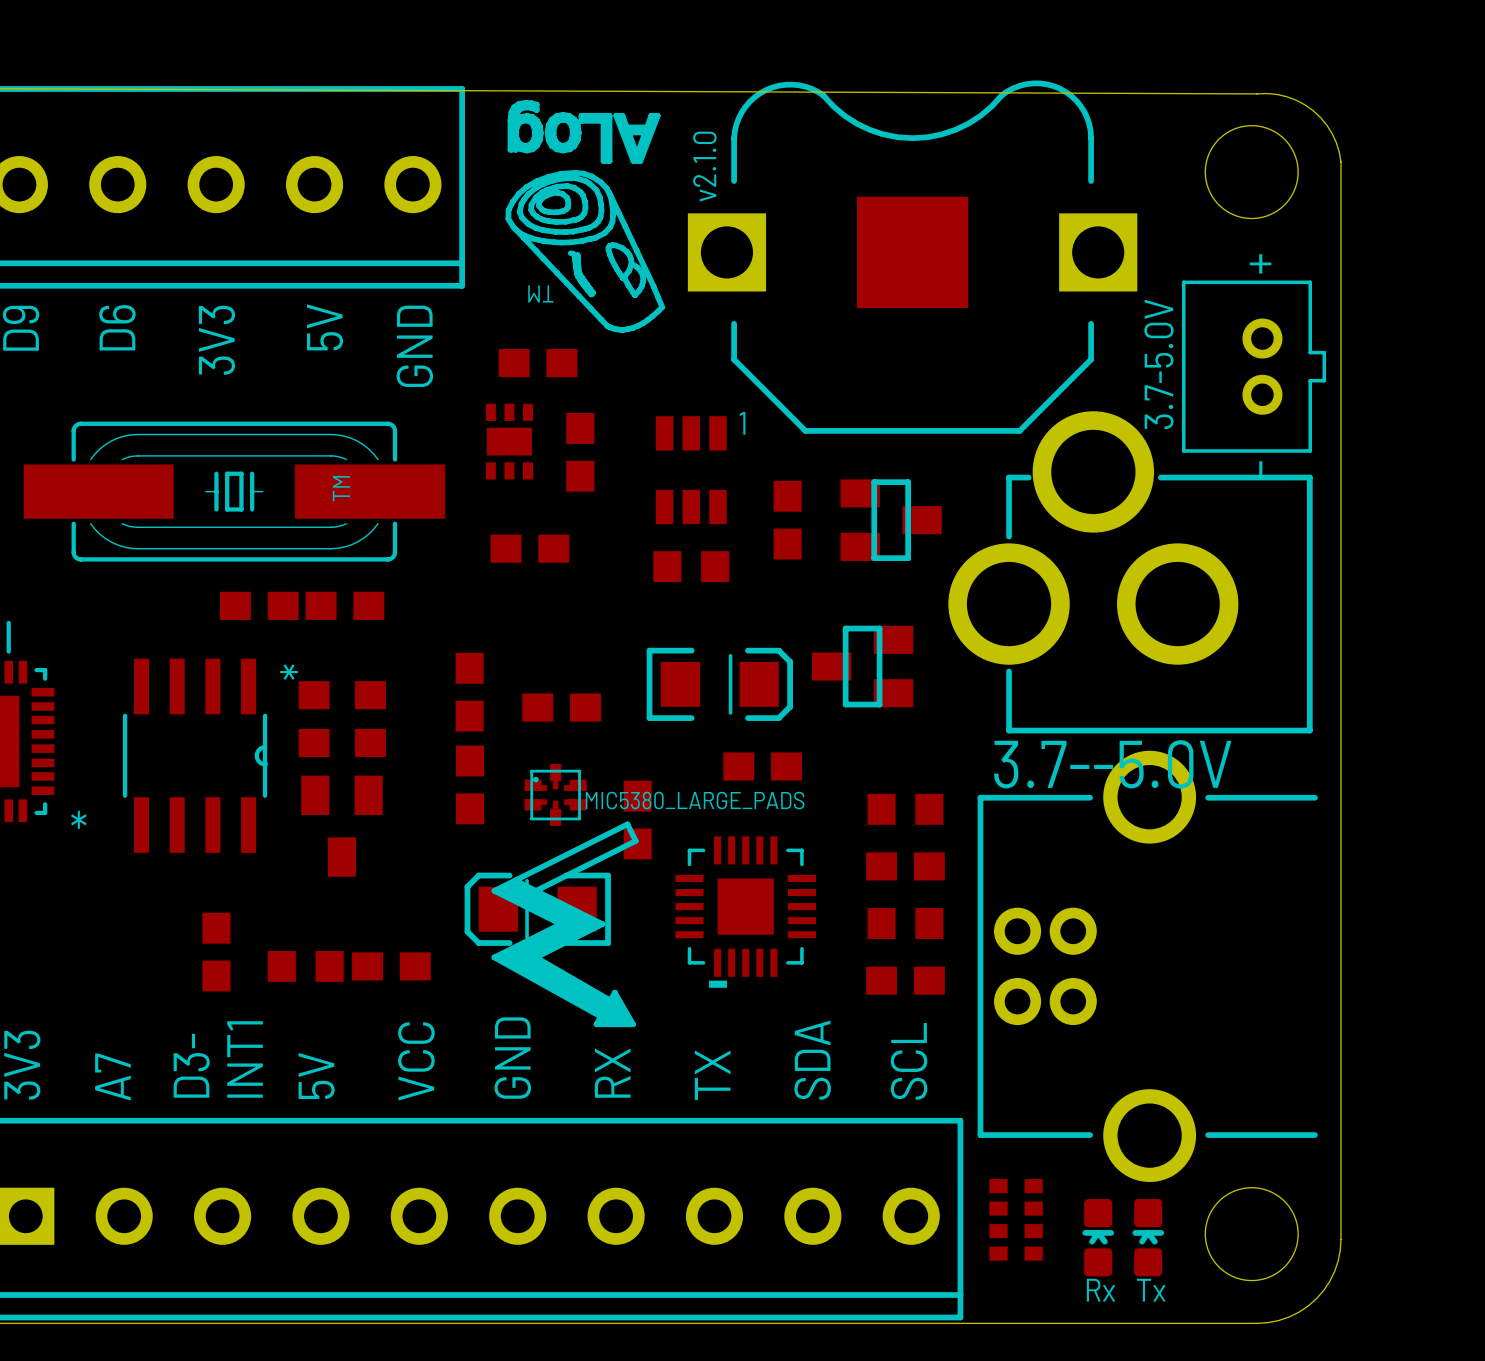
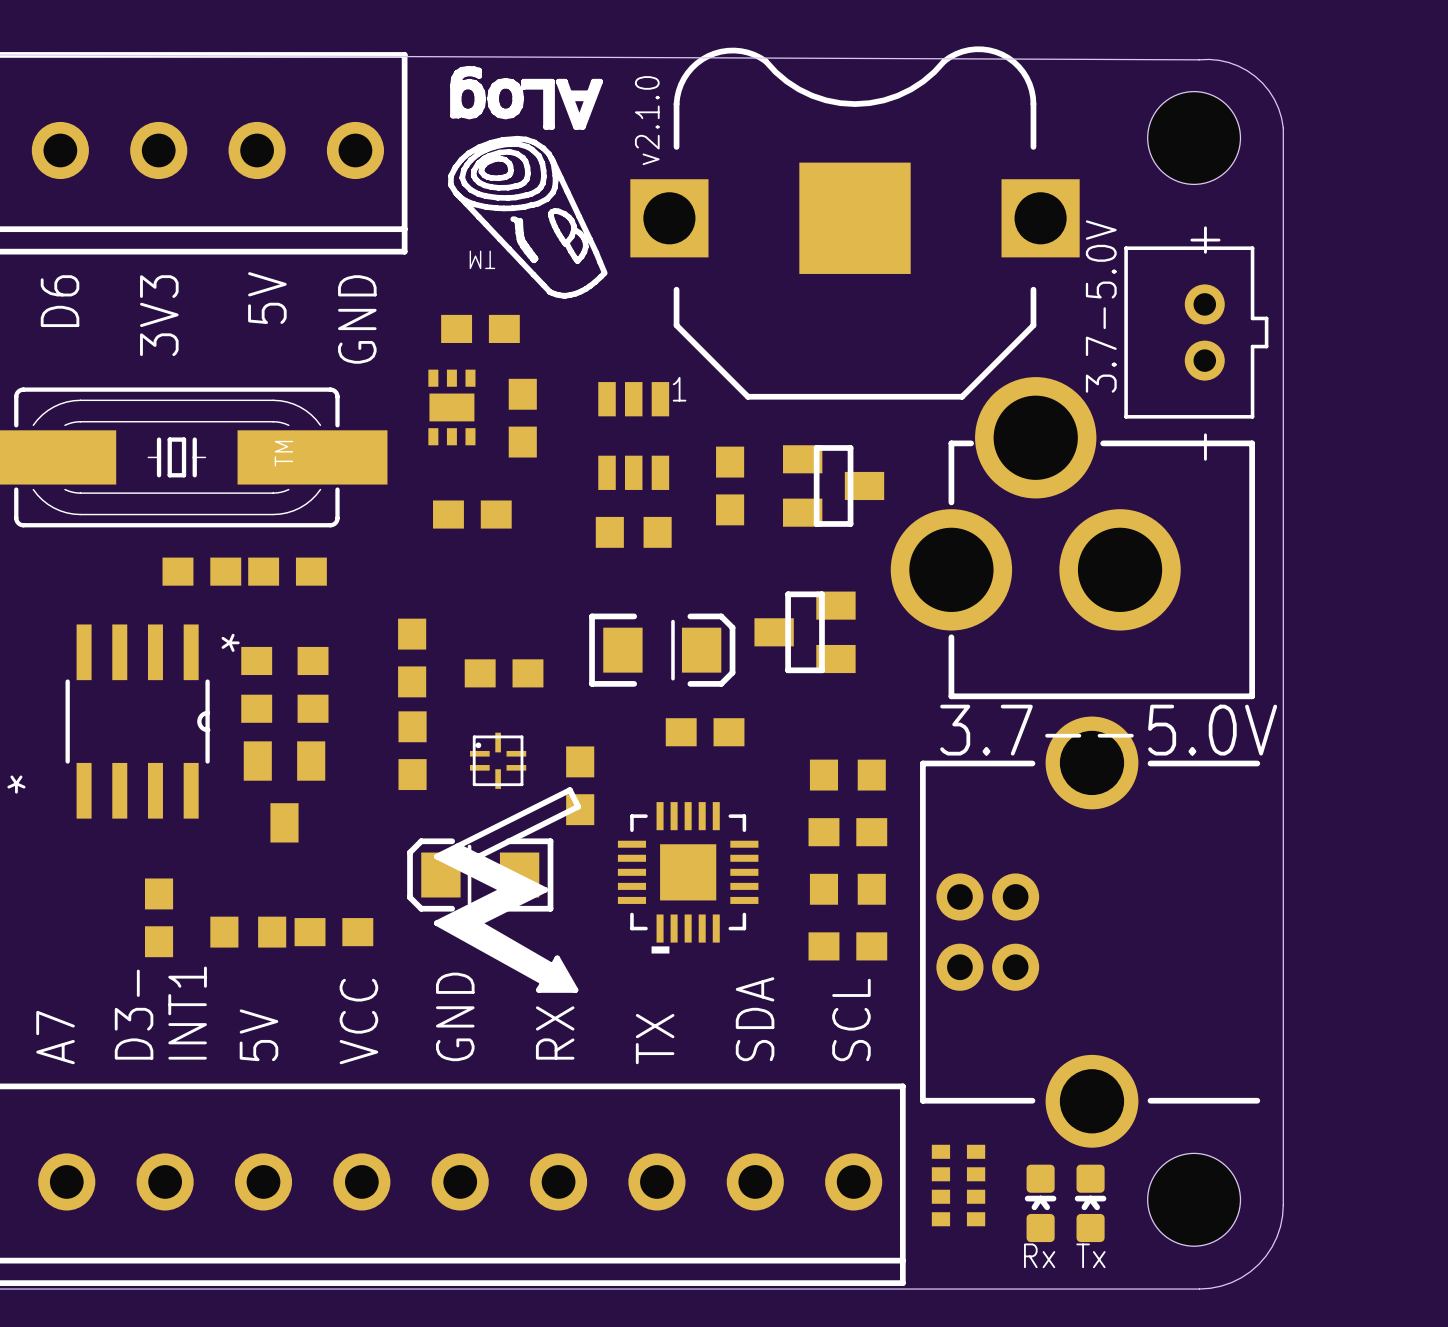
part footprint: [524, 764, 587, 826] -> [469, 732, 527, 789]
part value: MIC5380_LARGE_PADS (695, 800) -> none

